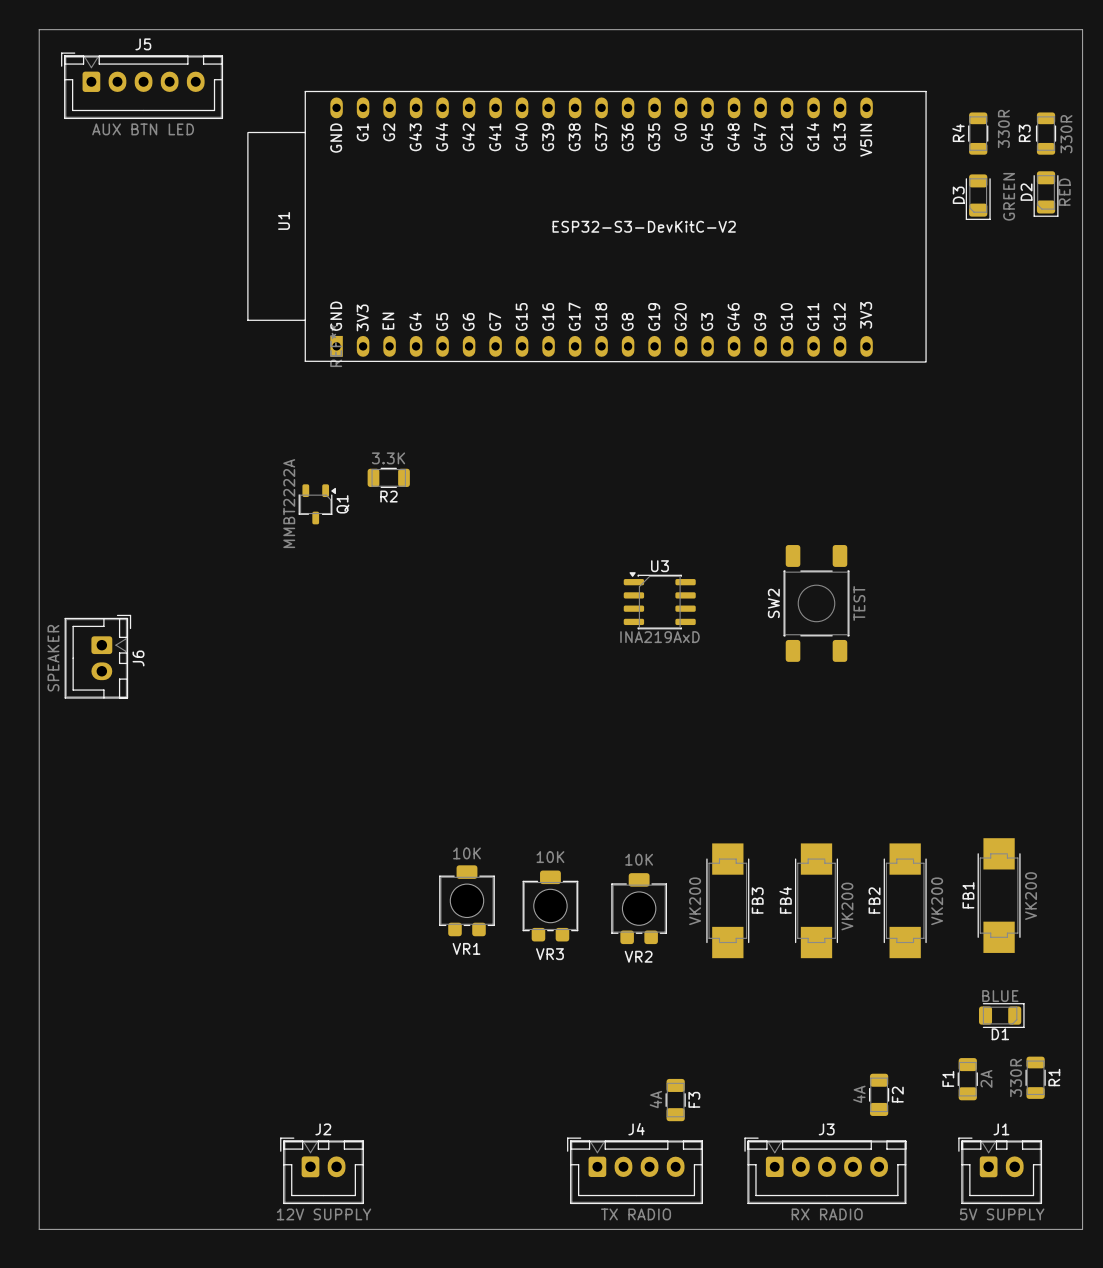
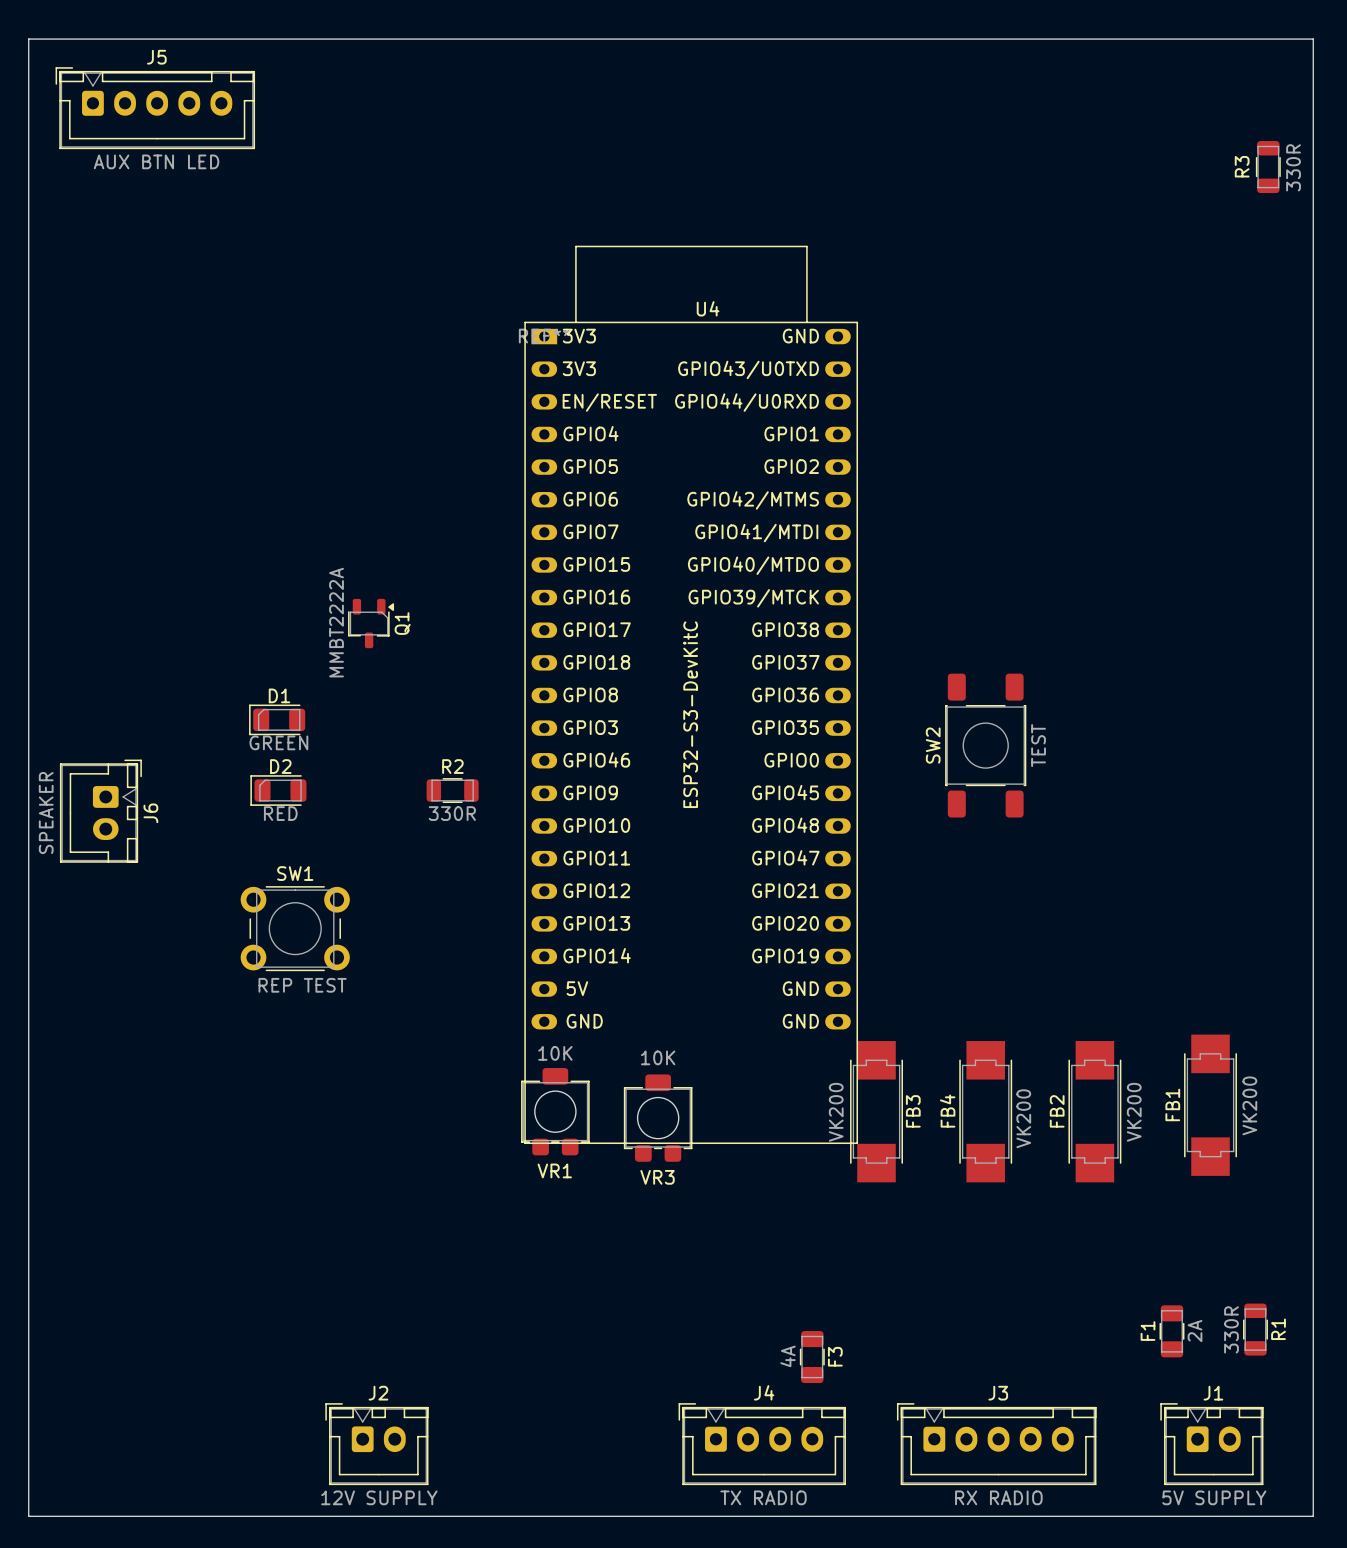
R4: 330R (978, 133) -> none
D2 rotation: 0° (1046, 194) -> 90° clockwise (278, 790)
D2 position: (1046, 194) -> (278, 790)
D3: GREEN (978, 197) -> none
U1: ESP32-S3-DevKitC-V2 (586, 226) -> none
R2 value: 3.3K (388, 458) -> 330R (452, 813)
R2 position: (388, 477) -> (452, 790)
R2 name position: R2 (388, 496) -> R2 (452, 766)
U4: none -> ESP32-S3-DevKitC (691, 694)
U3: INA219AxD (659, 600) -> none
SW1: none -> REP TEST (295, 928)
VR2: 10K (639, 908) -> none
D1 value: BLUE (1000, 996) -> GREEN (278, 742)
D1 rotation: 0° (1001, 1015) -> 180° (277, 719)
D1 position: (1001, 1015) -> (277, 719)
F2: 4A (879, 1094) -> none

